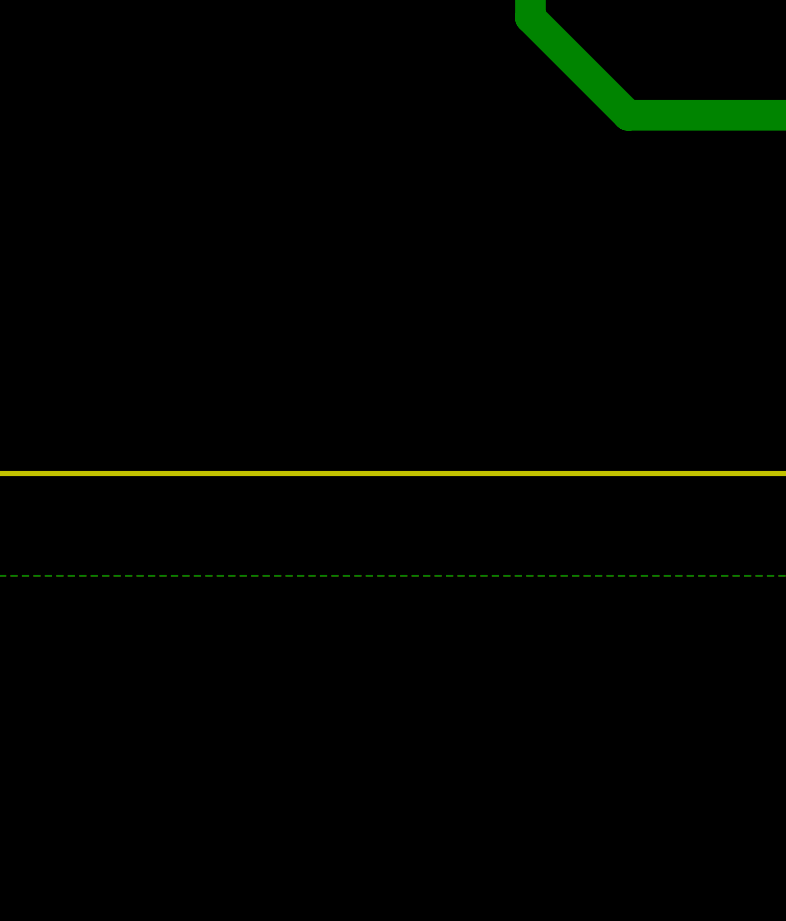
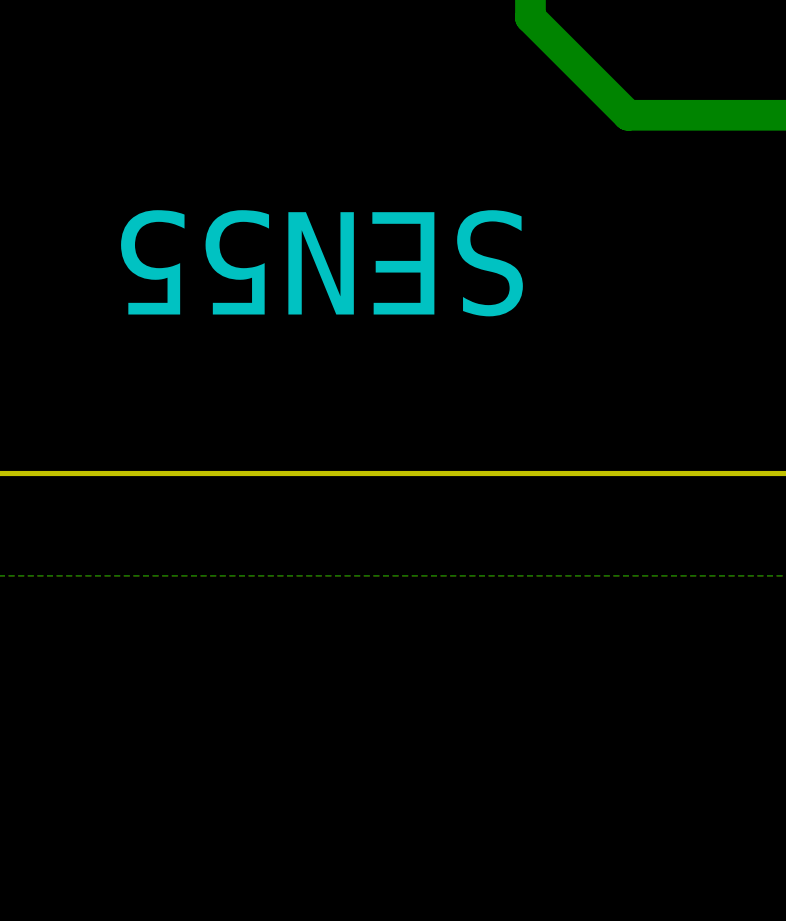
text: none -> SEN55 (321, 263)

